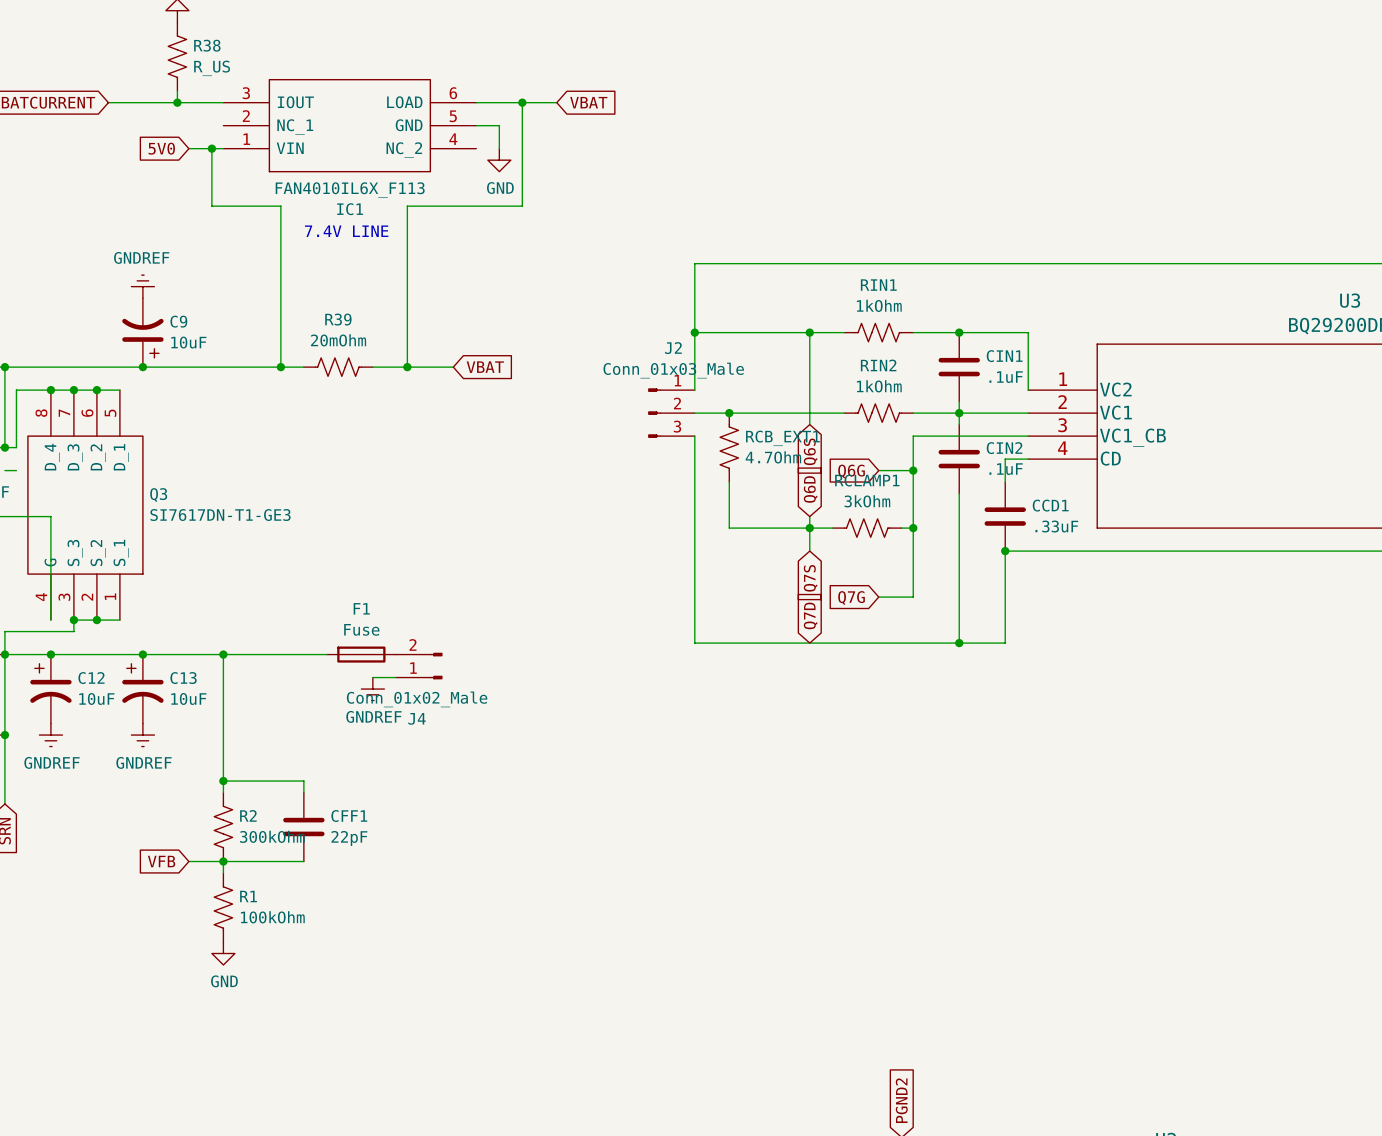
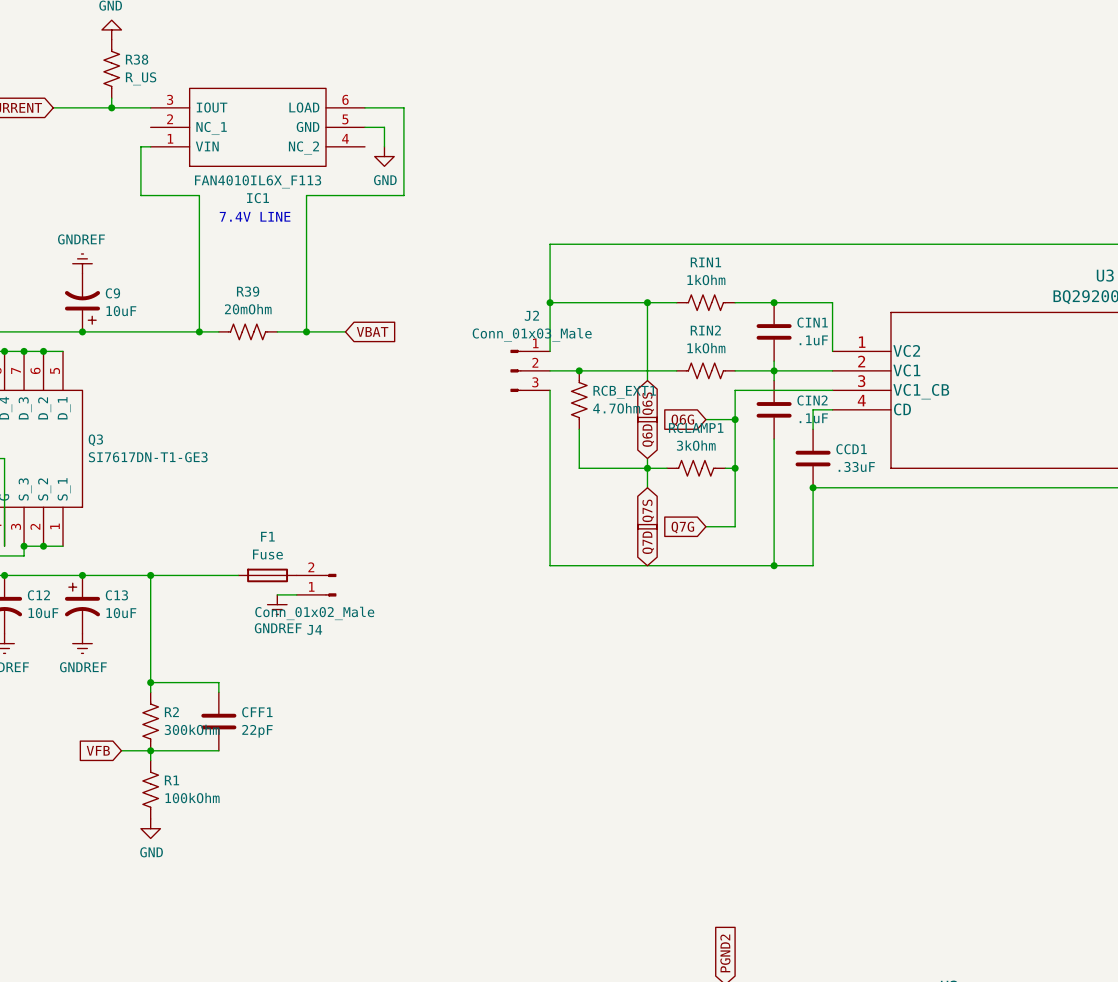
wire: (522, 102) (556, 102) -> none
junction: (522, 102) -> none
global label: VBAT (588, 102) -> none
global label: 5V0 (161, 148) -> none
wire: (188, 148) (211, 148) -> none
junction: (211, 148) -> none

